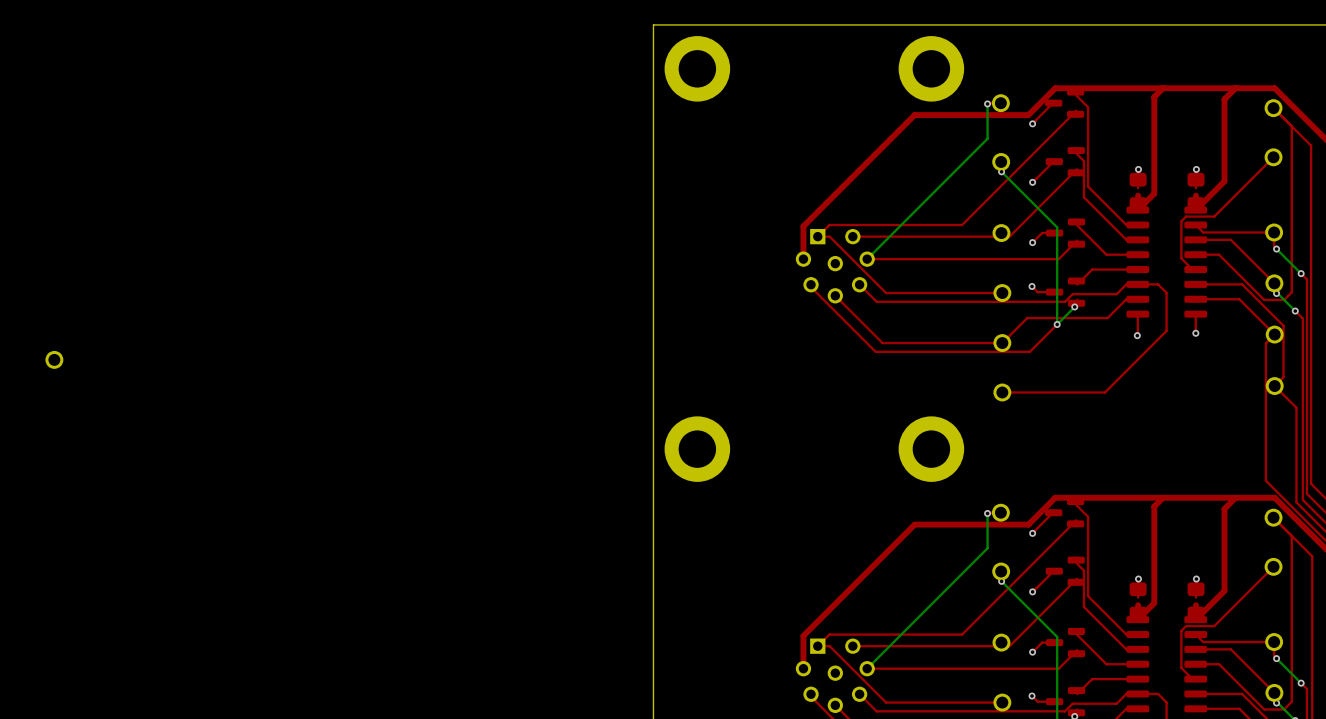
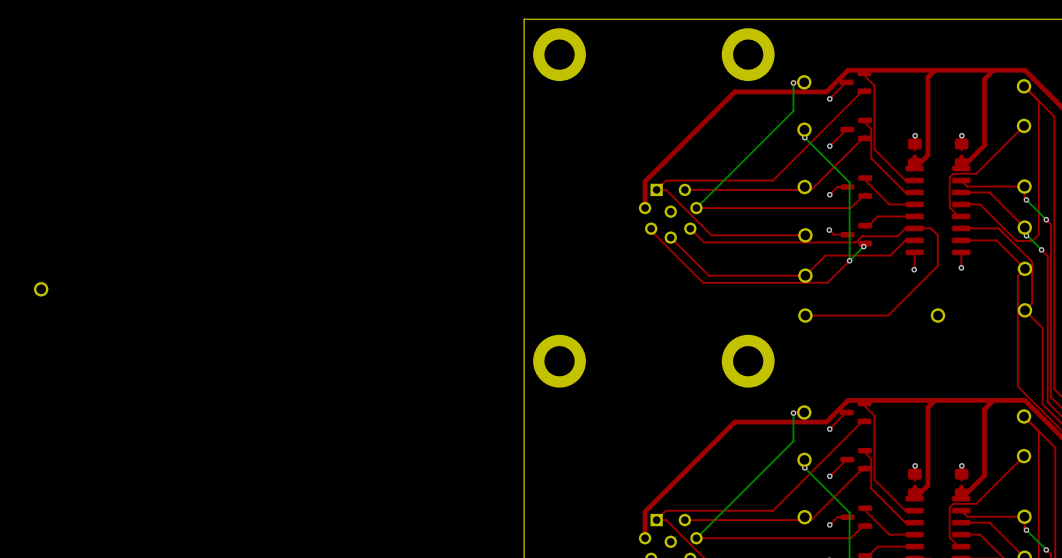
part: none -> (937, 315)

